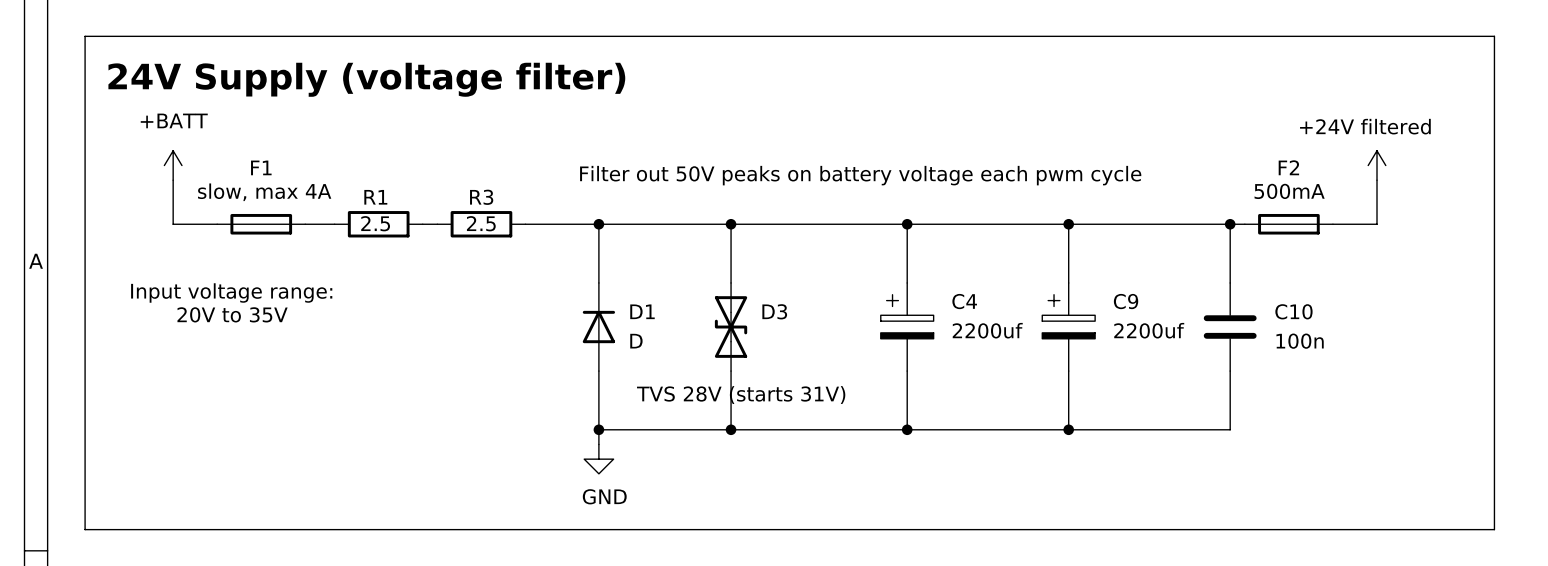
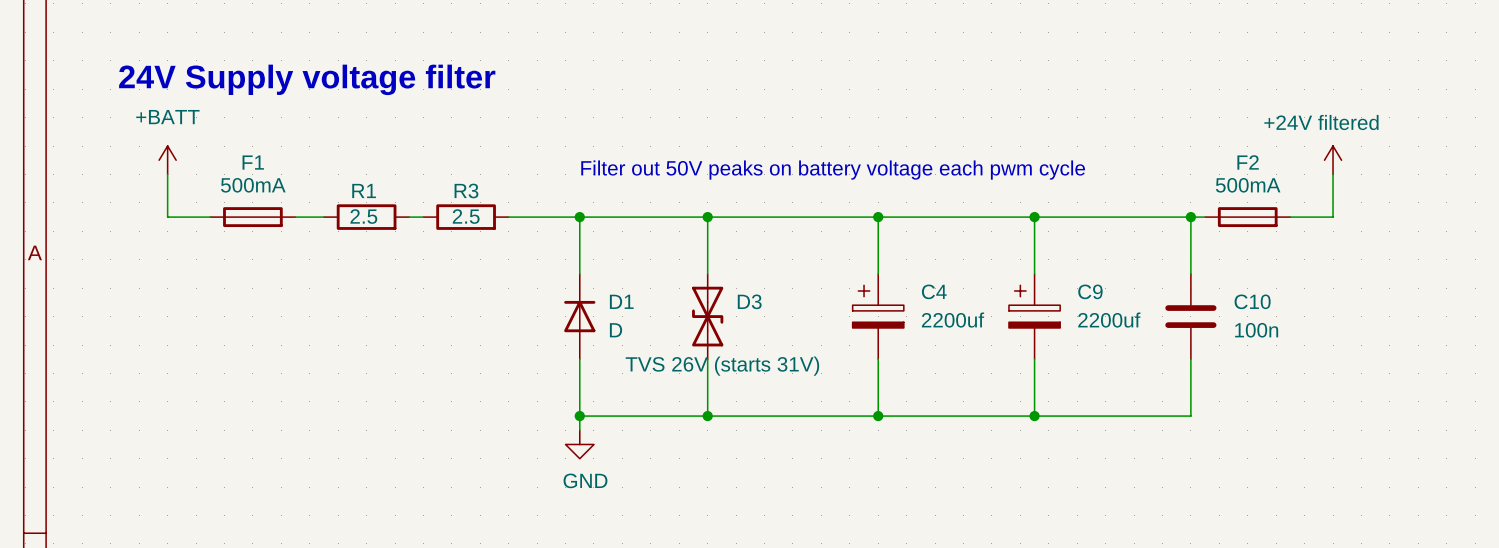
line: (85, 36) (1494, 36) (1494, 529) (85, 529) (85, 36) -> none
text: 24V Supply (voltage filter) (366, 79) -> 24V Supply voltage filter (307, 79)
F1 value: slow, max 4A (264, 192) -> 500mA (253, 185)
text: Input voltage range: (231, 292) -> none
text: 20V to 35V (232, 314) -> none
D3 value: TVS 28V (starts 31V) (741, 395) -> TVS 26V (starts 31V) (722, 366)

